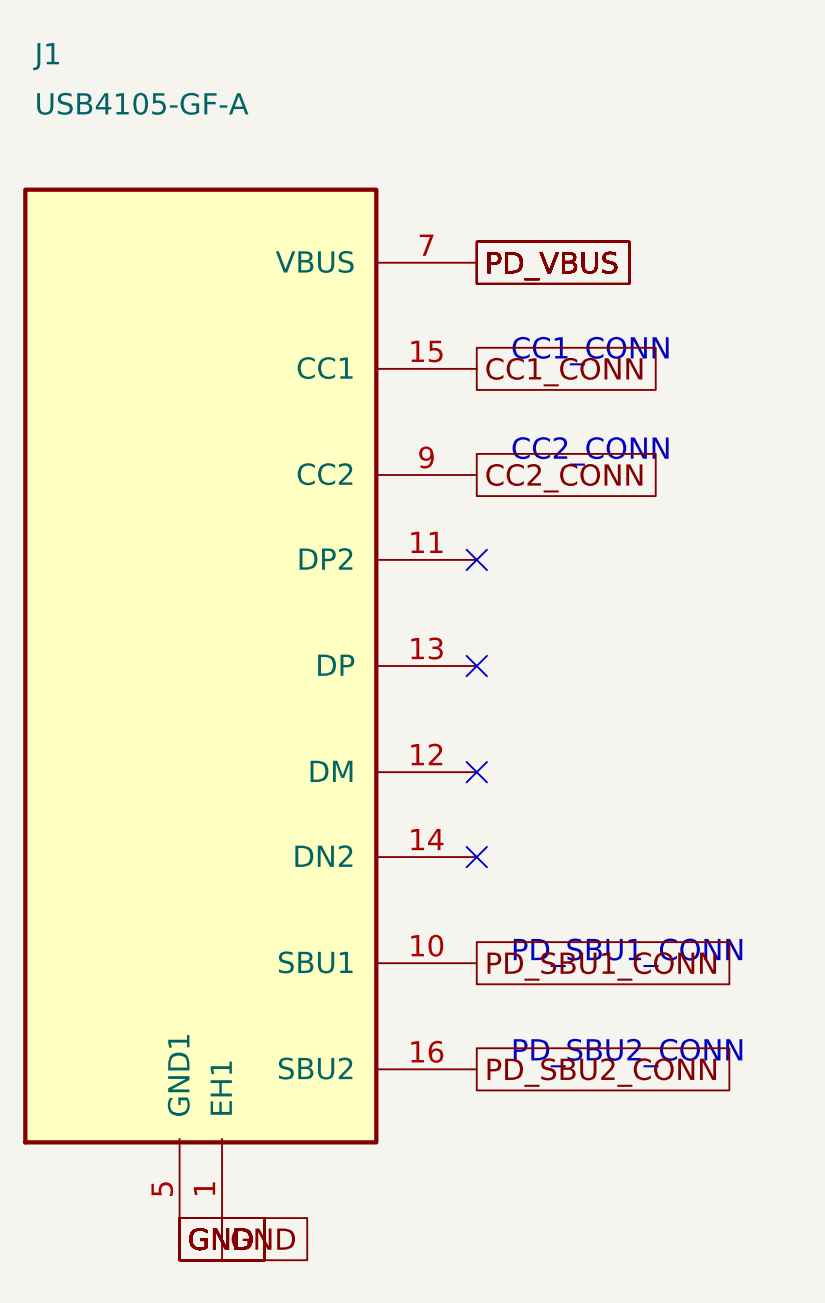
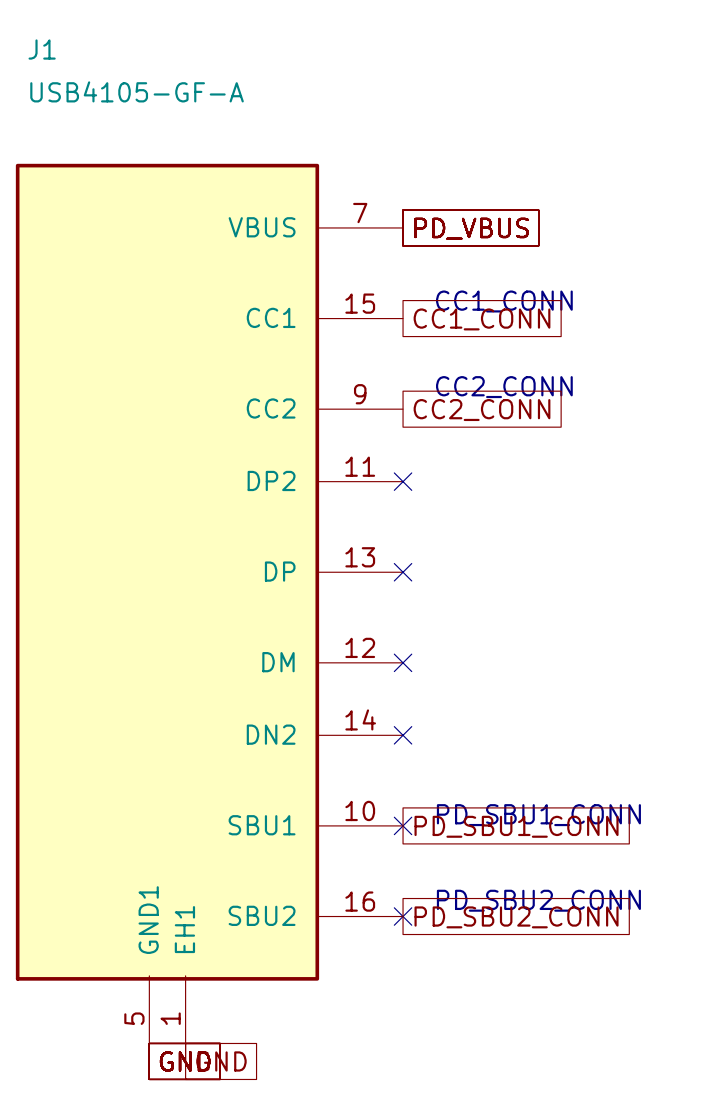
no-connect mark: none -> (403, 825)
no-connect mark: none -> (403, 916)

